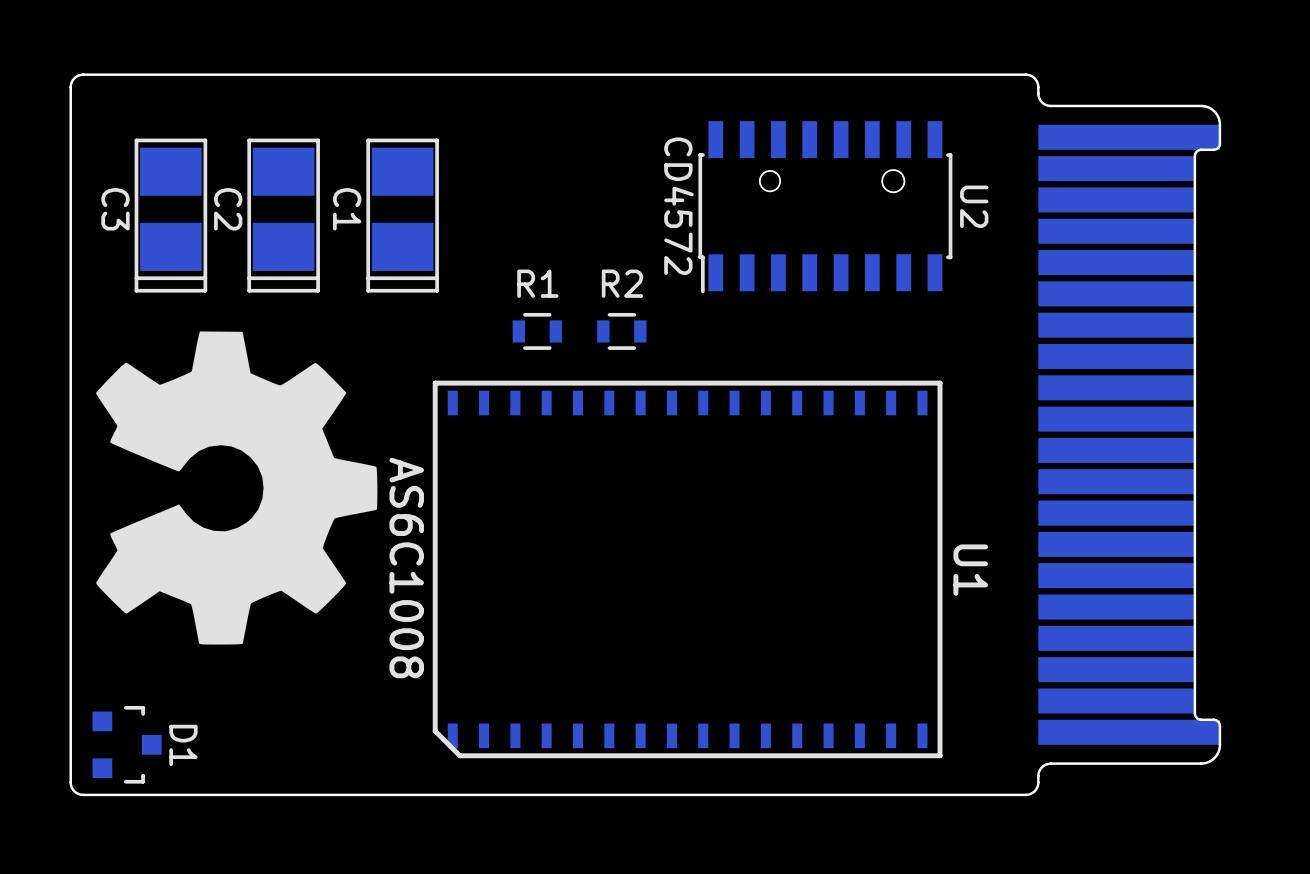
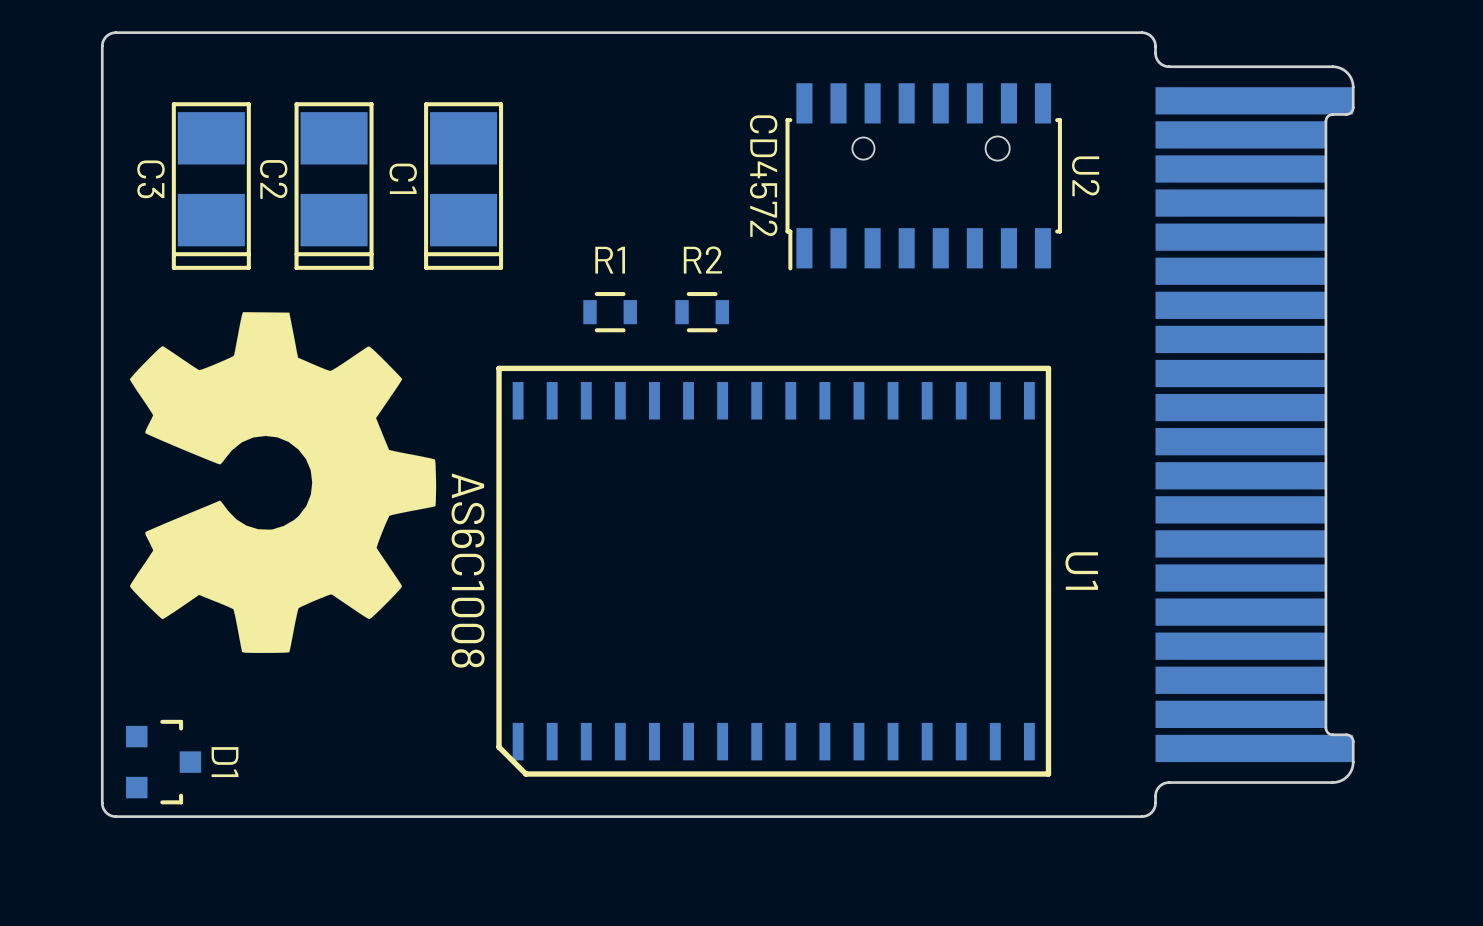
U1 footprint: [432, 380, 943, 759] -> [496, 365, 1052, 777]

